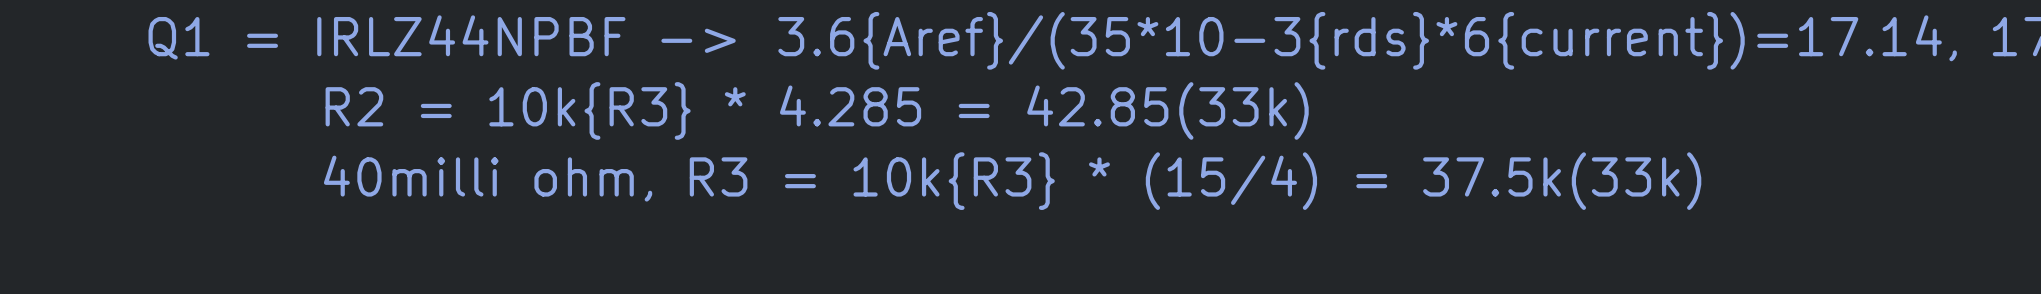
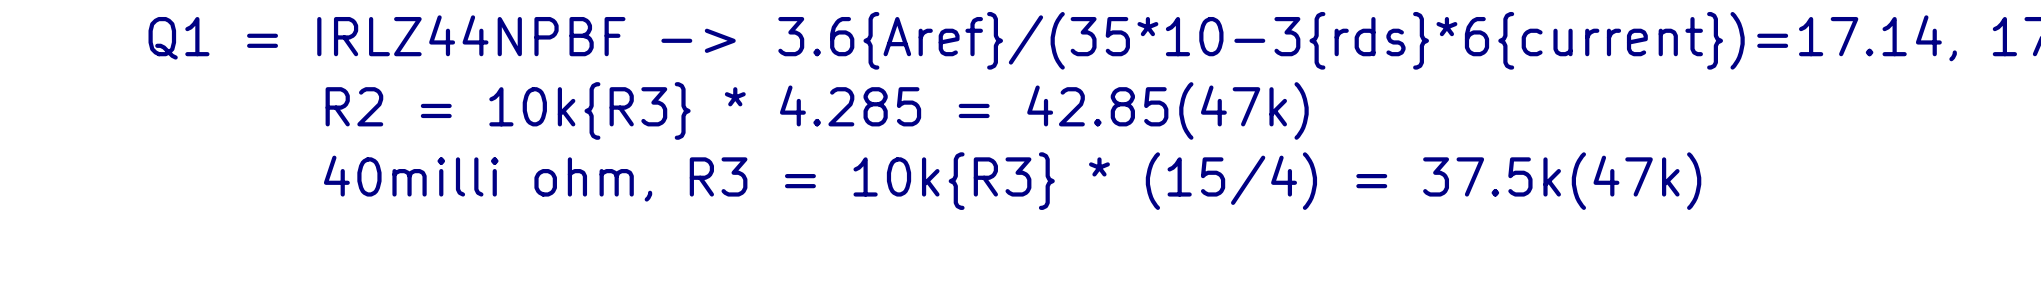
text: R2 = 10k{R3} * 4.285 = 42.85(33k) (817, 110) -> R2 = 10k{R3} * 4.285 = 42.85(47k) (817, 110)
text: 40milli ohm, R3 = 10k{R3} * (15/4) = 37.5k(33k) (1012, 181) -> 40milli ohm, R3 = 10k{R3} * (15/4) = 37.5k(47k) (1012, 181)

